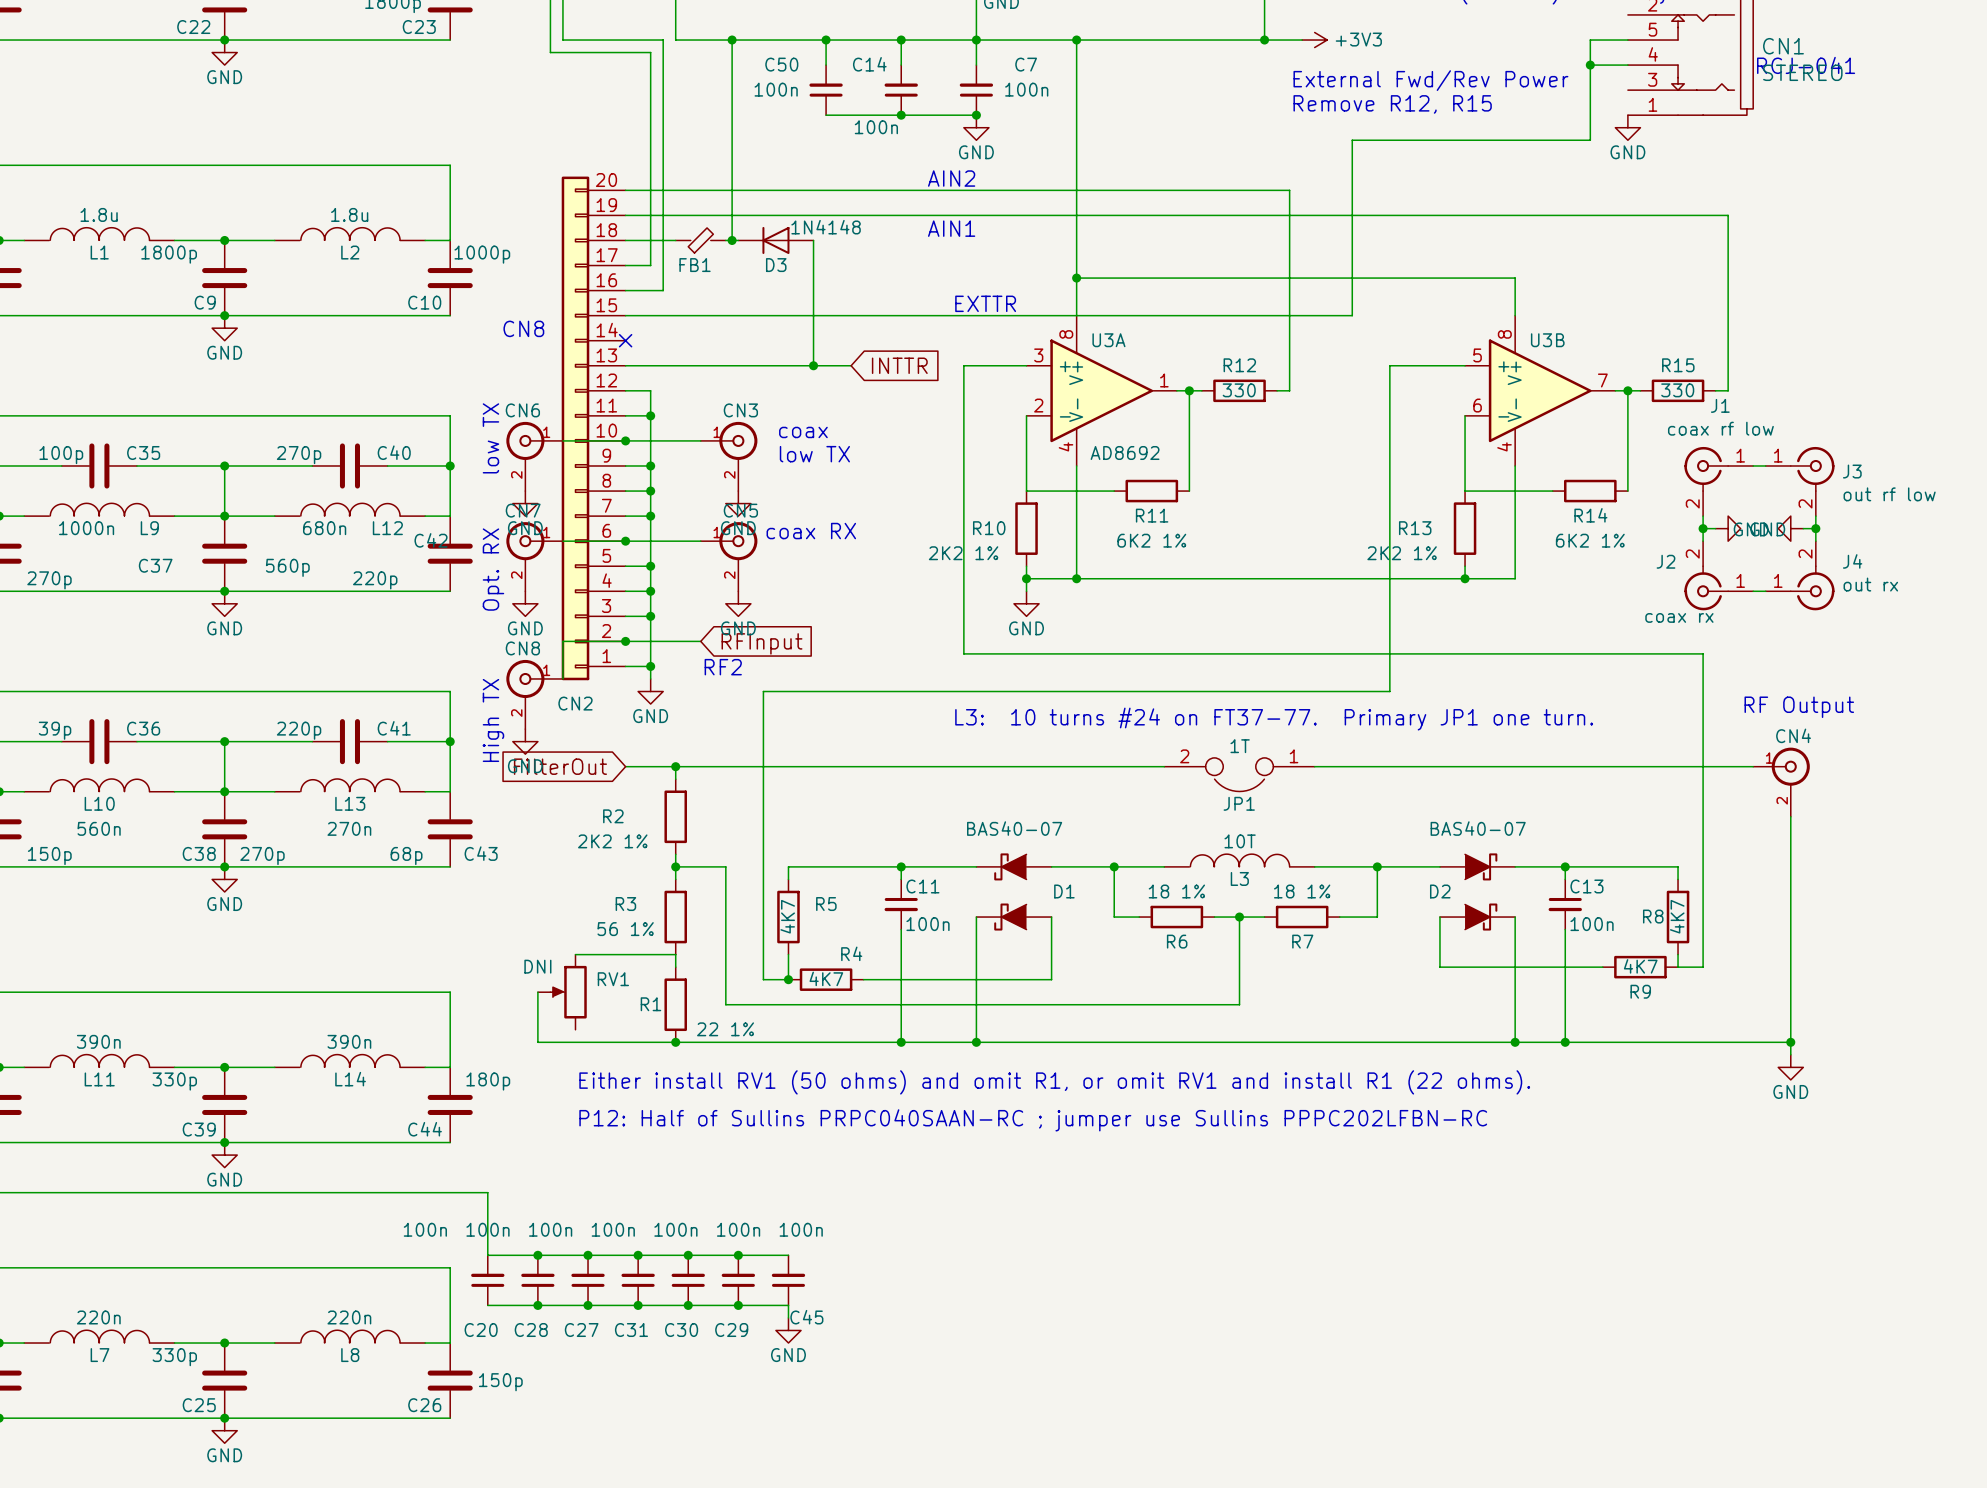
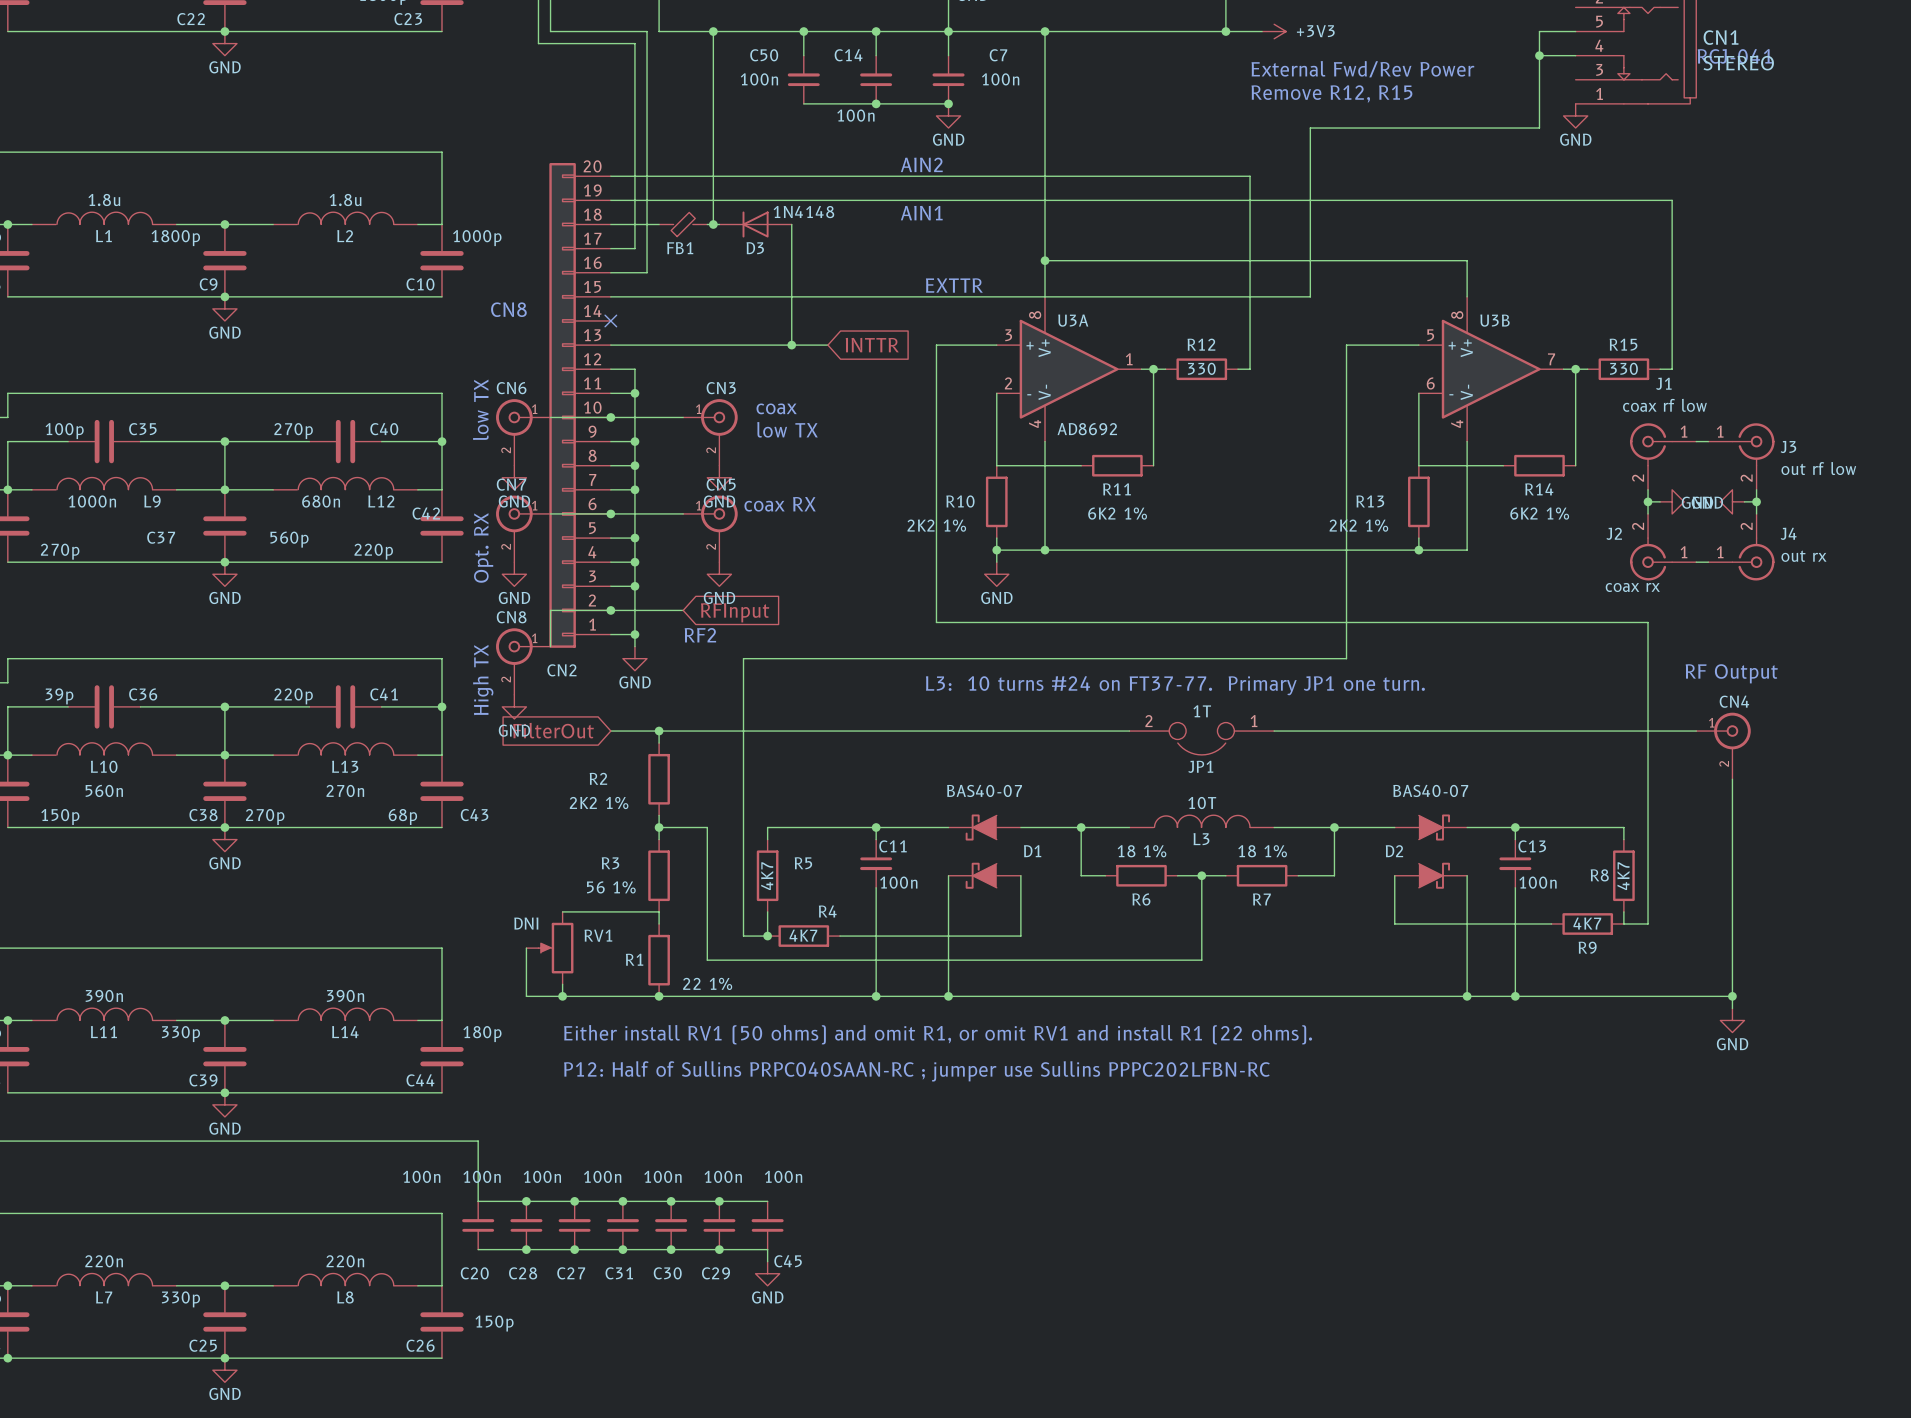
wire: none -> (562, 984) (562, 996)
junction: none -> (562, 996)

